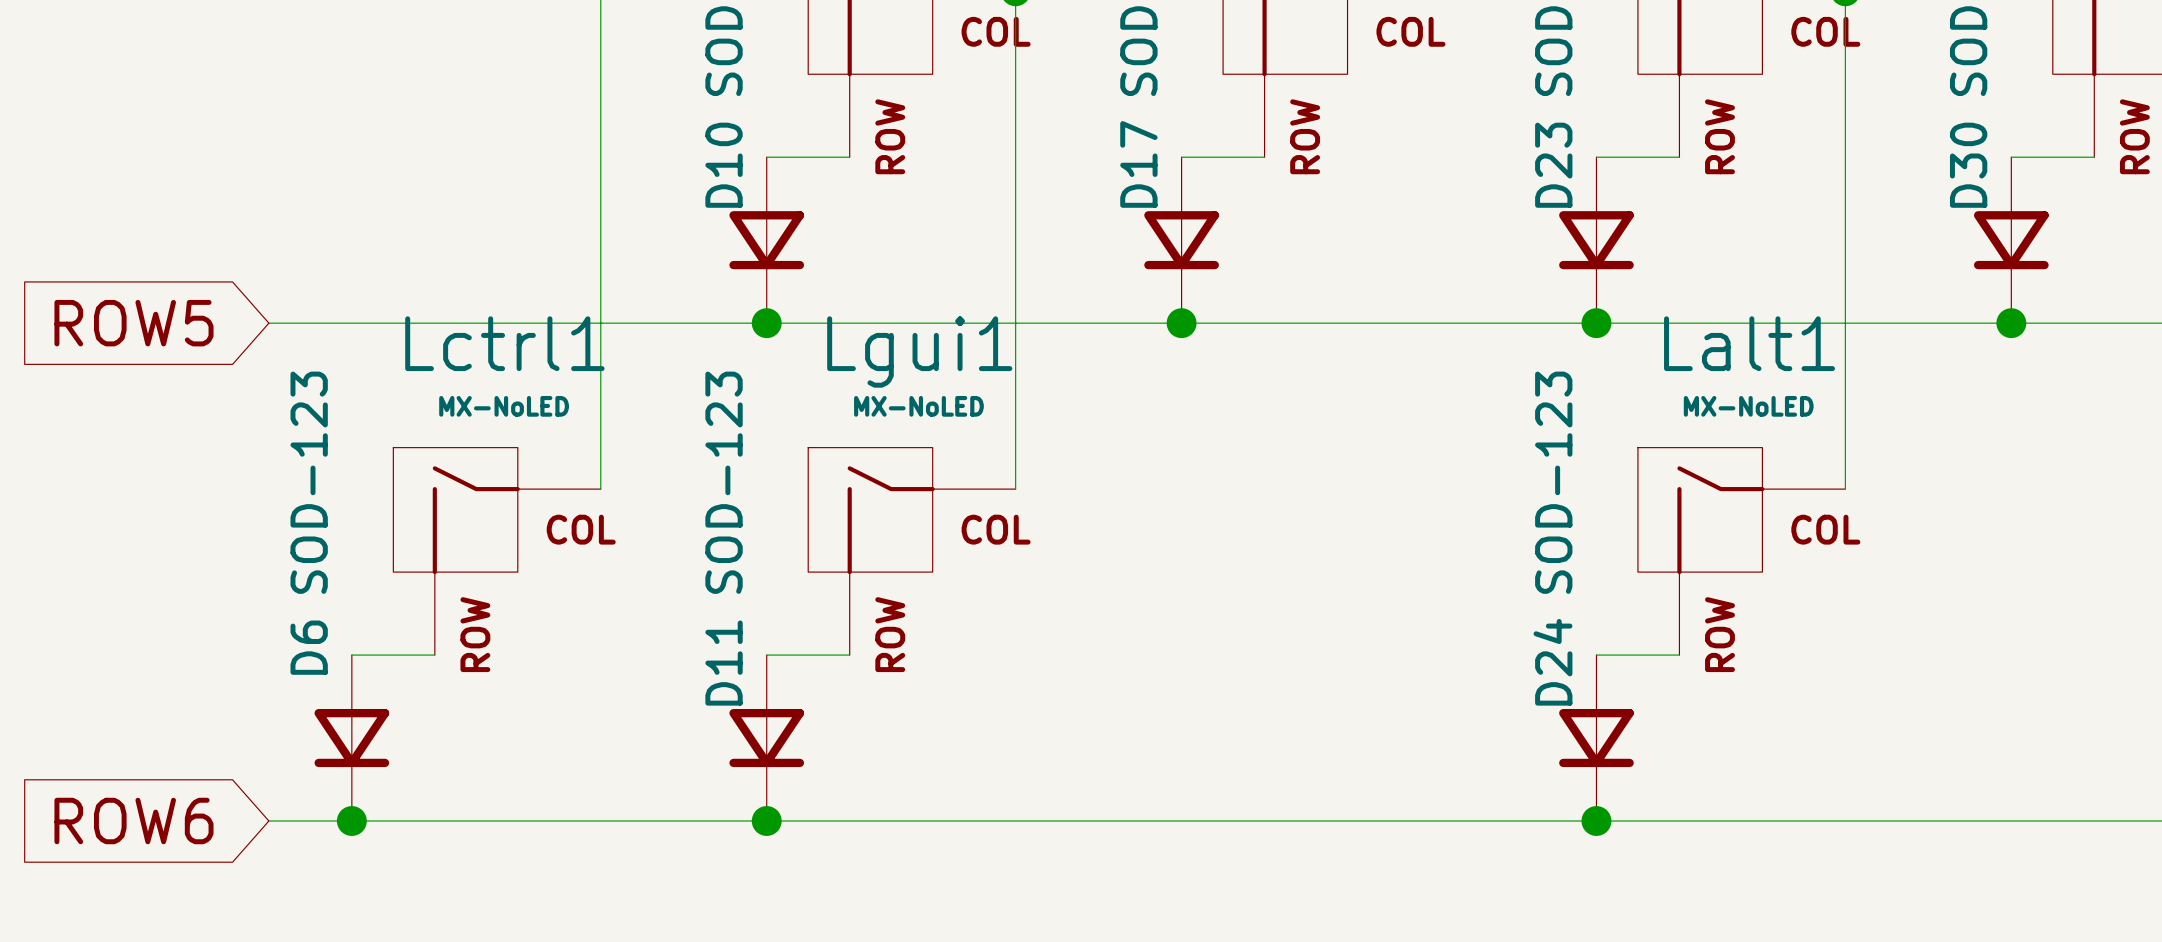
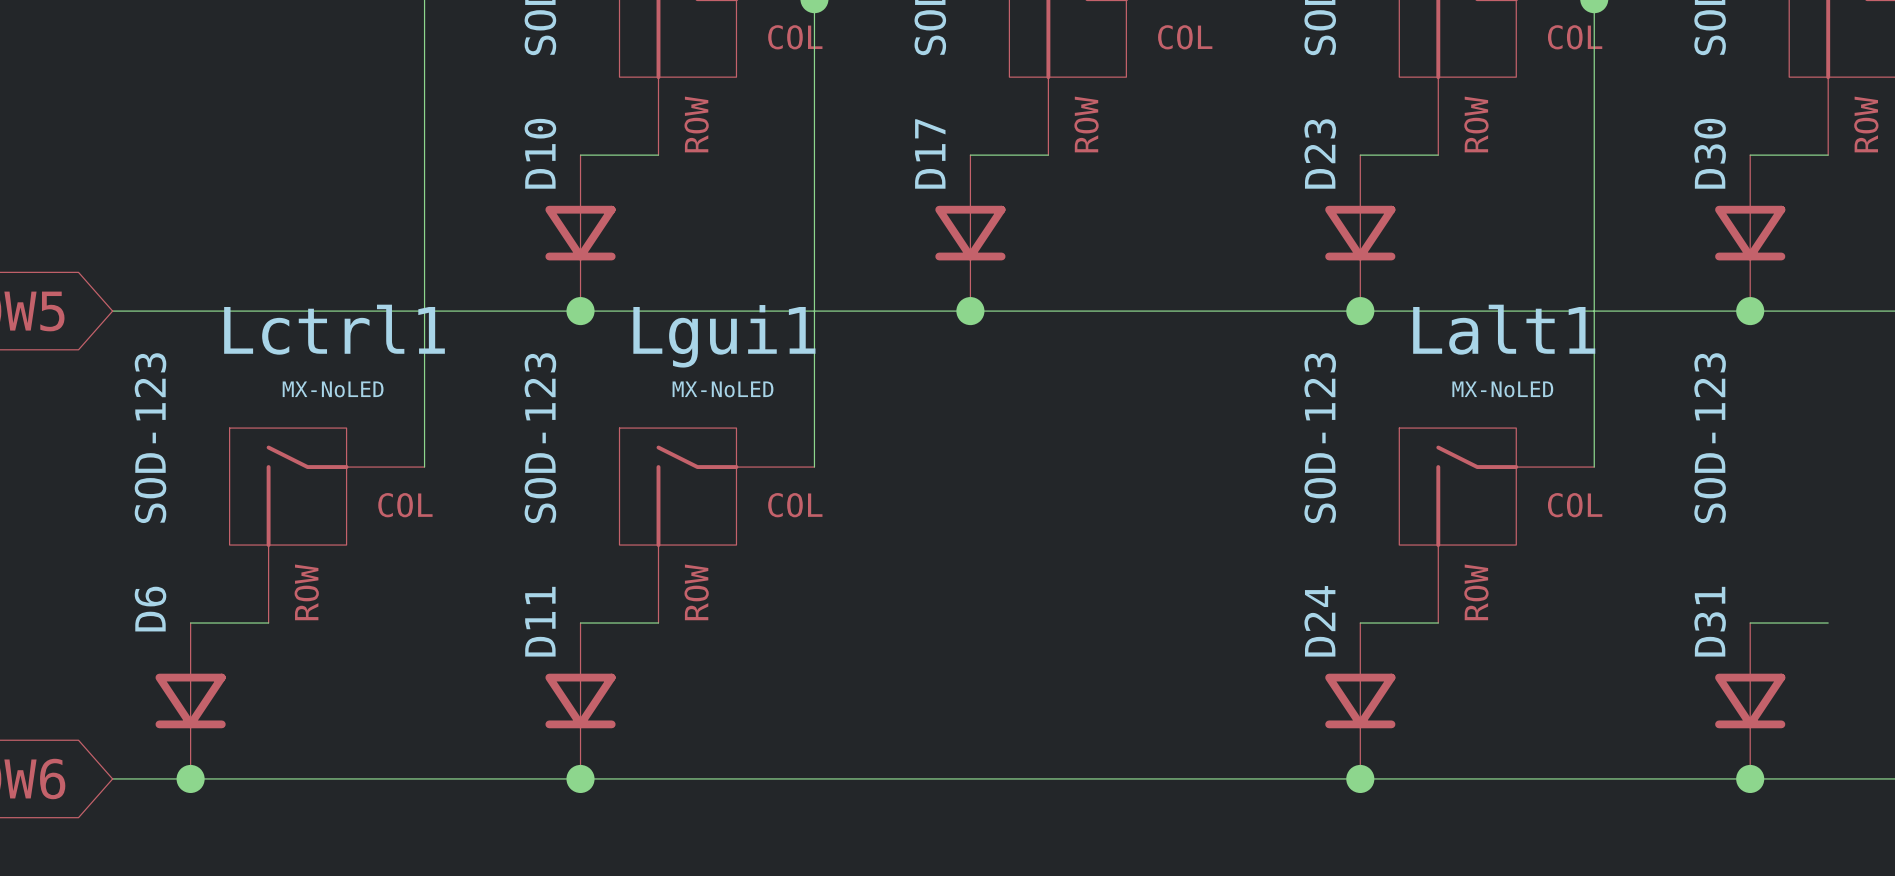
wire: none -> (1750, 623) (1828, 623)
D31: none -> SOD-123 (1750, 700)
junction: none -> (1750, 778)

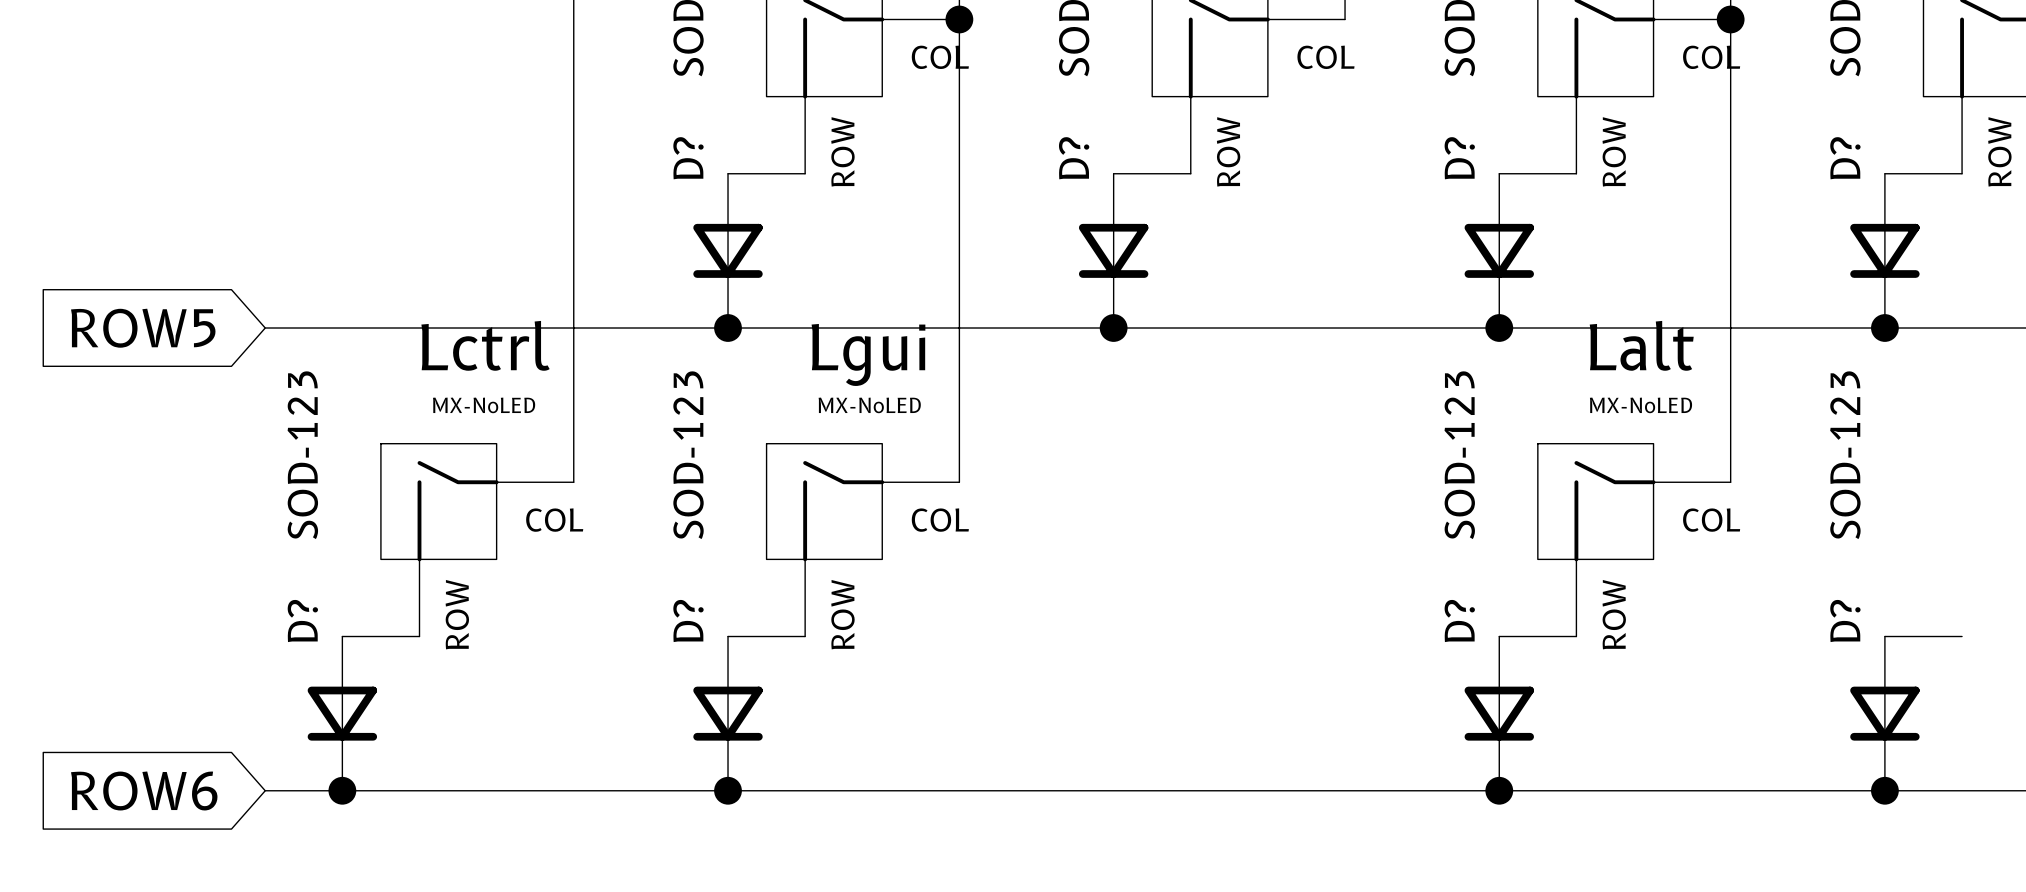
D10 name: D10 (540, 153) -> D? (688, 158)
D17 name: D17 (930, 153) -> D? (1074, 158)
D23 name: D23 (1320, 153) -> D? (1459, 158)
D30 name: D30 (1710, 153) -> D? (1845, 158)
Lctrl1 name: Lctrl1 (334, 329) -> Lctrl (485, 345)
Lalt1 name: Lalt1 (1504, 329) -> Lalt (1641, 345)
Lgui1 name: Lgui1 (724, 336) -> Lgui (868, 354)
D6 name: D6 (150, 609) -> D? (302, 621)
D11 name: D11 (540, 621) -> D? (688, 621)
D24 name: D24 (1319, 621) -> D? (1459, 621)
D31 name: D31 (1710, 621) -> D? (1845, 621)

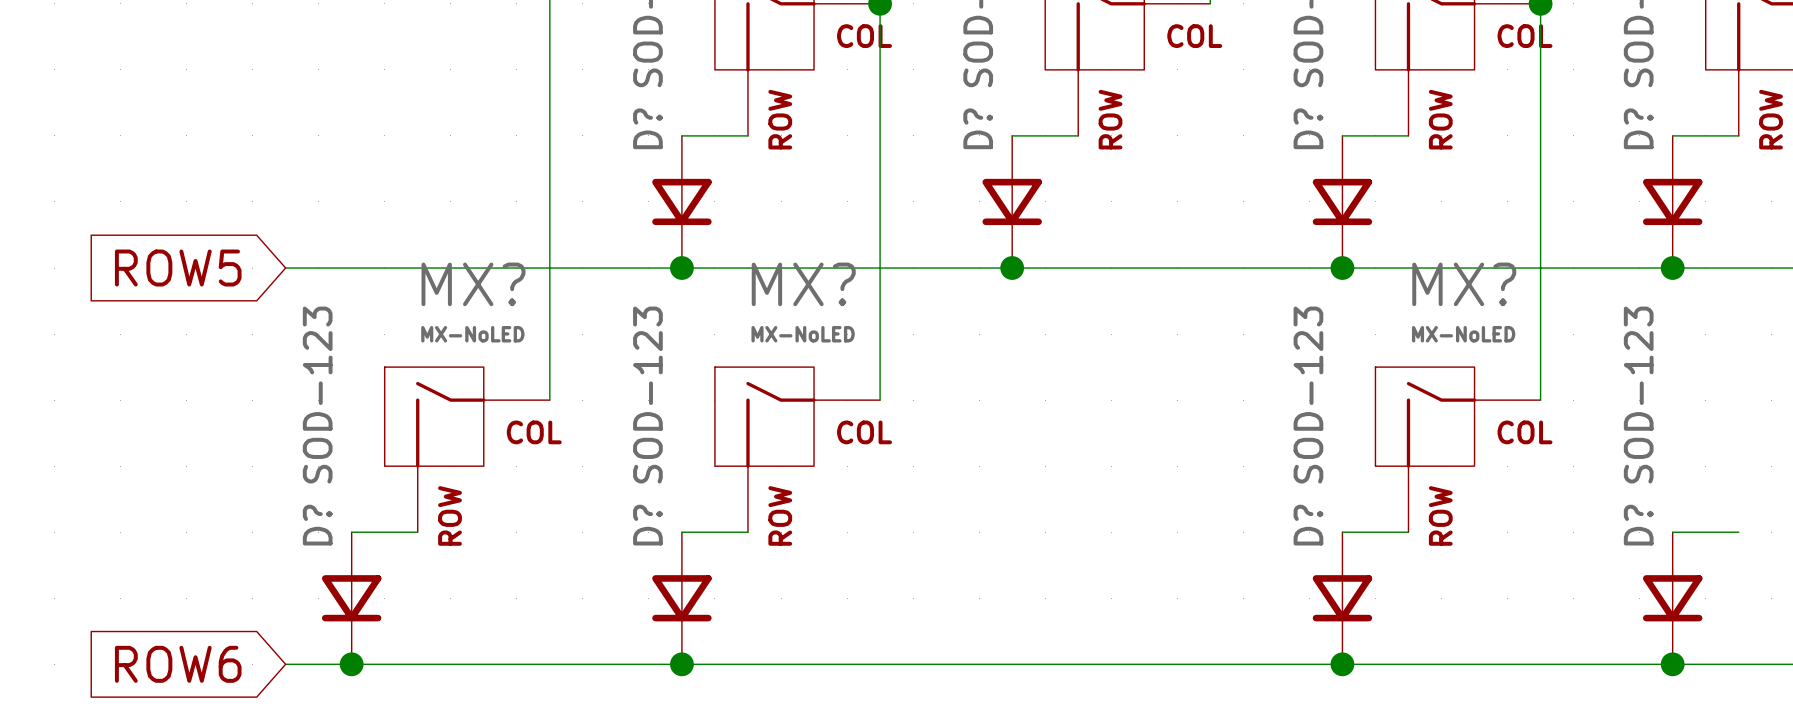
Lctrl name: Lctrl (485, 345) -> MX? (473, 284)
Lalt name: Lalt (1641, 345) -> MX? (1464, 284)
Lgui name: Lgui (868, 354) -> MX? (803, 284)

